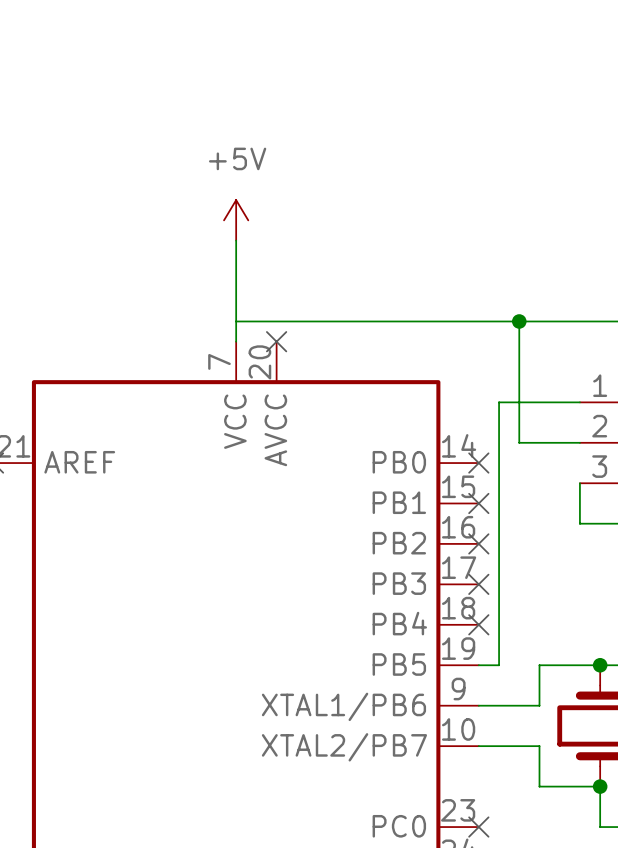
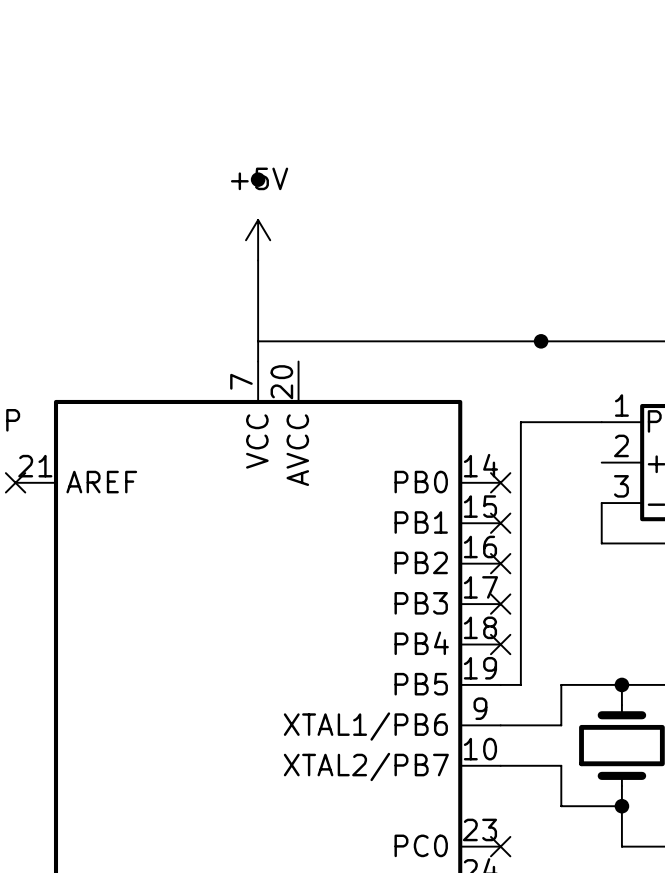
junction: none -> (258, 179)
wire: (519, 321) (519, 442) (579, 442) -> none
no-connect mark: (276, 341) -> none

